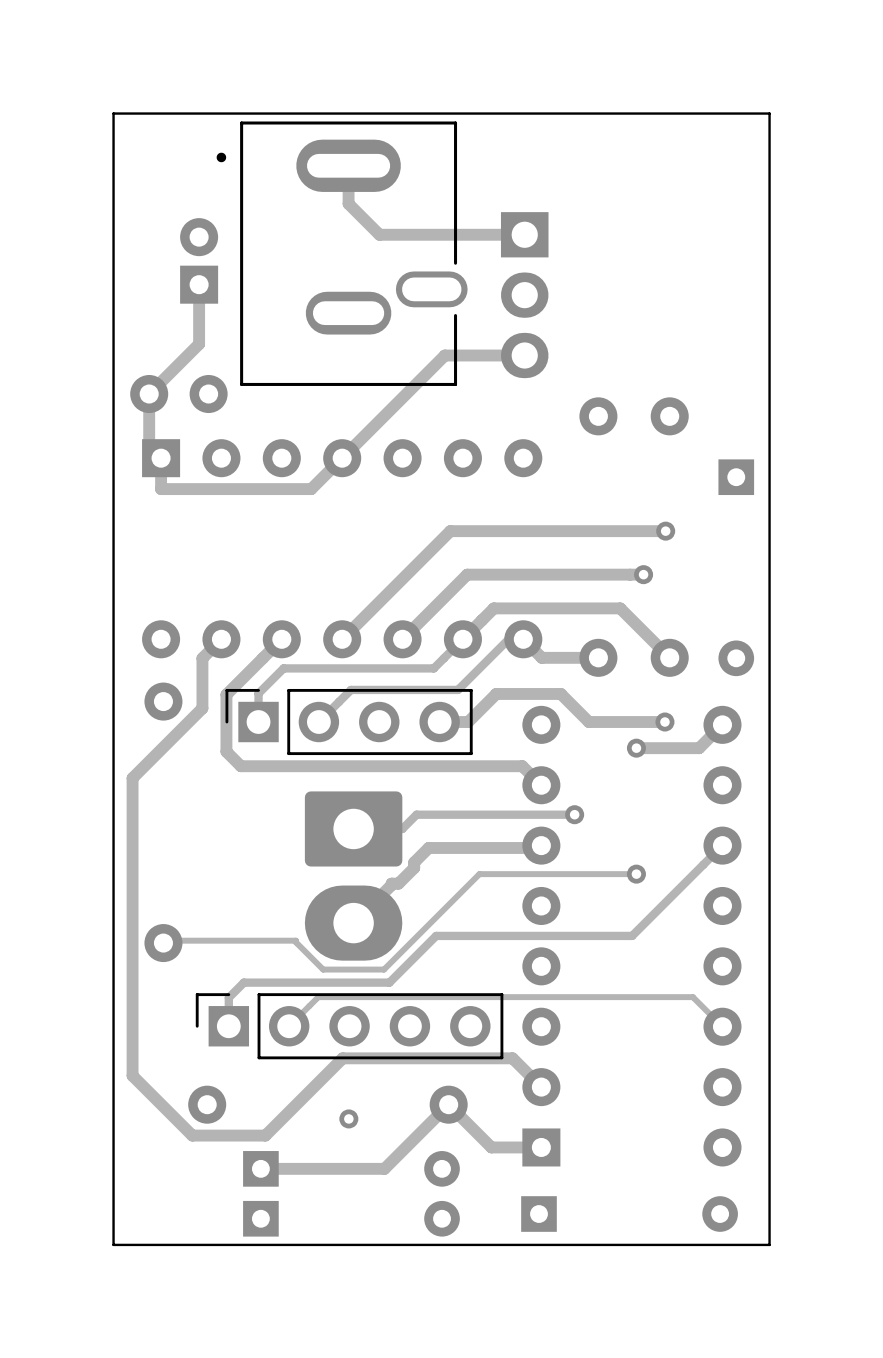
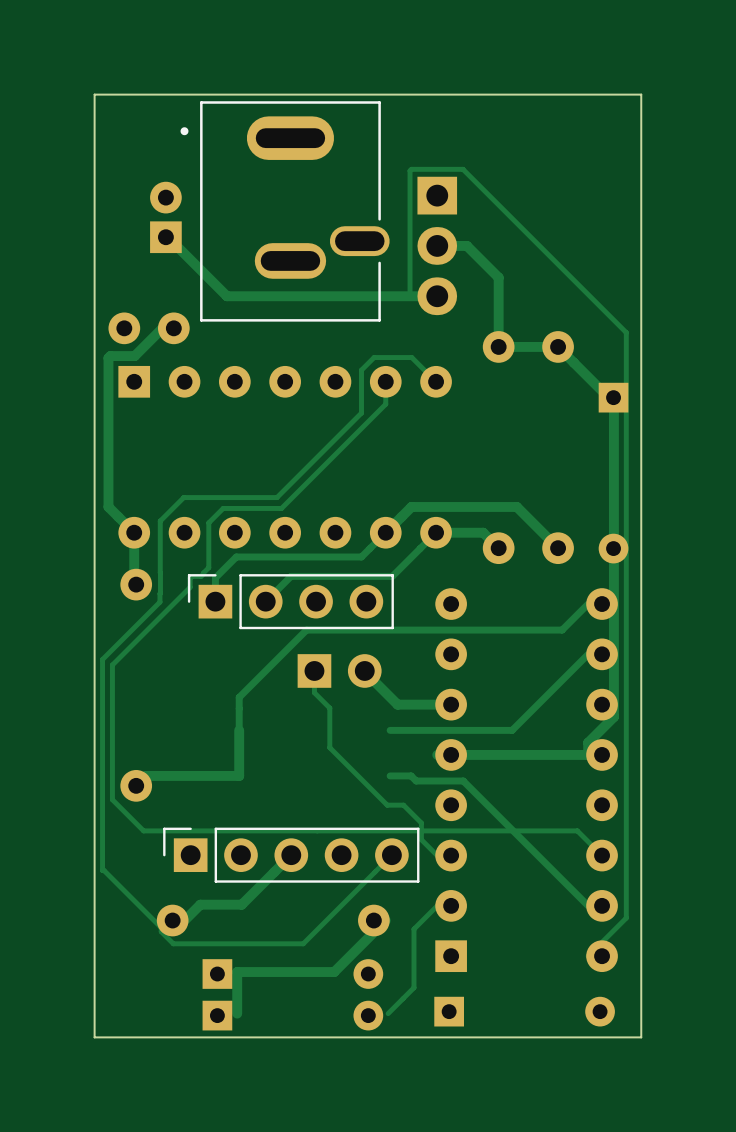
track: (348, 165) (348, 203) (379, 234) (524, 234) -> none
track: (199, 284) (199, 344) (149, 394) (149, 446) (161, 458) (161, 489) (311, 489) (444, 355) -> (165, 237) (226, 296) (370, 296)
track: none -> (437, 245) (466, 245) (498, 277) (498, 346)
track: none -> (437, 296) (412, 296) (410, 293) (411, 169) (463, 169) (626, 332) (626, 918) (588, 956)
track: none -> (173, 328) (162, 328) (134, 356) (110, 356) (108, 358) (108, 506) (134, 532) (134, 582) (136, 584)
track: none -> (498, 346) (558, 346) (613, 402) (613, 717) (588, 742) (588, 754) (437, 754)
track: none -> (436, 381) (411, 357) (374, 357) (361, 370) (361, 413) (277, 497) (183, 497) (160, 521) (160, 572)
track: (665, 531) (450, 531) (342, 639) -> none
via: (665, 531) -> none
track: (643, 574) (467, 574) (402, 639) -> none
via: (643, 574) -> none
track: (221, 639) (202, 658) (202, 708) (132, 778) (132, 1075) (192, 1135) (265, 1135) (342, 1058) (512, 1058) (541, 1087) -> none
track: (281, 639) (226, 694) (226, 751) (240, 766) (522, 766) (541, 785) -> none
track: (598, 657) (541, 657) (523, 639) (508, 639) (458, 689) (350, 689) (349, 691) -> (498, 548) (483, 532) (436, 532) (392, 576) (290, 576)
track: none -> (160, 572) (159, 602) (102, 659) (102, 870) (161, 927) (161, 931) (173, 943) (303, 943) (391, 855)
track: (439, 722) (468, 722) (496, 693) (560, 693) (588, 722) (664, 722) -> none
via: (664, 722) -> none
track: (722, 724) (699, 748) (636, 748) -> none
via: (636, 748) -> none
track: none -> (588, 654) (512, 730) (390, 730)
track: none -> (314, 670) (314, 692) (329, 708) (329, 747) (387, 805) (403, 805) (421, 823) (421, 839) (437, 855)
part: none -> (339, 670)
track: none -> (364, 670) (397, 704) (437, 704)
track: (574, 814) (416, 814) (402, 828) (353, 828) -> none
via: (574, 814) -> none
track: (541, 845) (538, 847) (428, 847) (414, 862) (414, 867) (398, 883) (391, 883) (353, 923) -> none
track: (722, 845) (632, 935) (436, 935) (389, 982) (243, 982) (228, 997) (228, 1026) -> none
track: (636, 874) (479, 874) (384, 969) (323, 969) (295, 940) (165, 940) -> (588, 604) (562, 630) (306, 630) (239, 697) (239, 775) (146, 775) (138, 783)
via: (636, 874) -> none
part: (353, 876) -> none
track: none -> (390, 775) (411, 775) (416, 780) (463, 780) (588, 905)
track: (318, 997) (289, 1026) -> (265, 830) (143, 830) (112, 799) (112, 665) (190, 587) (190, 578) (201, 576) (208, 567) (208, 522) (223, 508) (281, 508) (385, 404) (385, 381)
track: none -> (291, 855) (241, 904) (200, 904) (184, 920)
track: none -> (437, 905) (413, 929) (413, 987) (388, 1013)
track: none -> (385, 920) (334, 972) (237, 972) (237, 1013)
via: (348, 1118) -> none
track: (541, 1147) (491, 1147) (448, 1104) (384, 1168) (260, 1168) -> none

